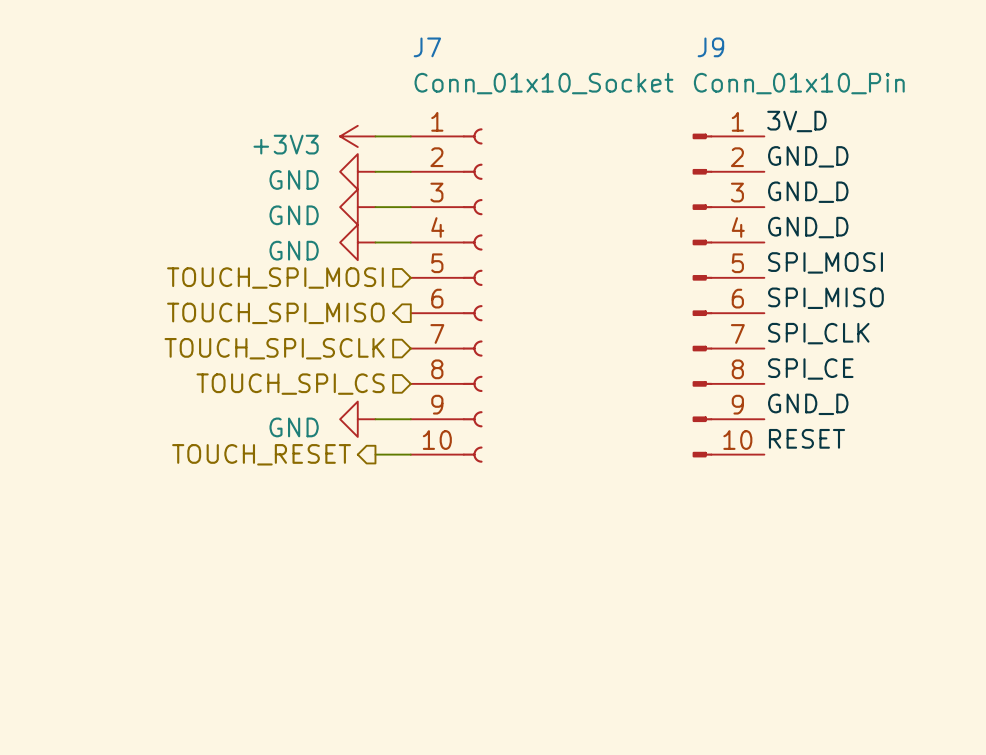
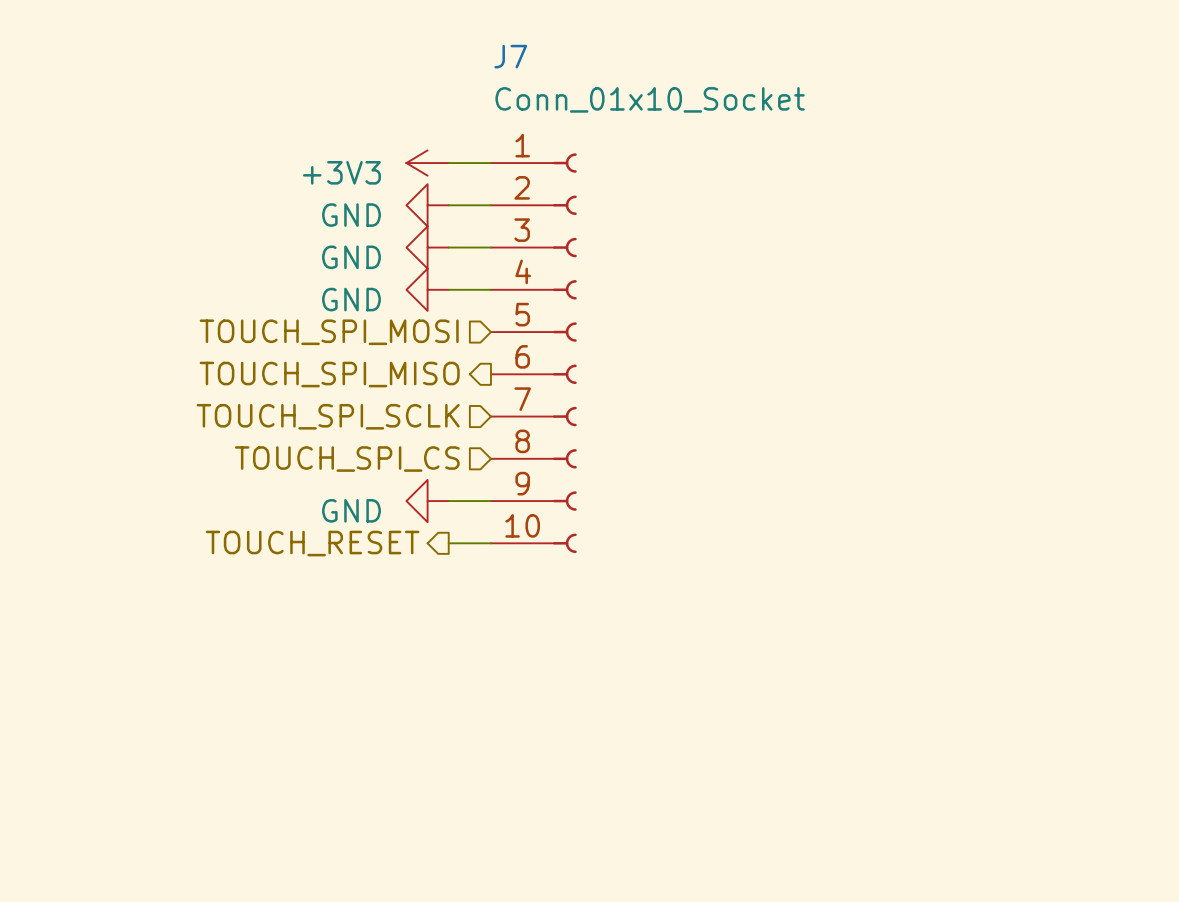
label: 3V_D (796, 121) -> none
label: GND_D (808, 156) -> none
label: GND_D (808, 192) -> none
label: GND_D (808, 227) -> none
label: SPI_MOSI (825, 262) -> none
J9: Conn_01x10_Pin (728, 295) -> none
label: SPI_MISO (825, 298) -> none
label: SPI_CLK (818, 333) -> none
label: SPI_CE (810, 368) -> none
label: GND_D (808, 404) -> none
label: RESET (807, 438) -> none

